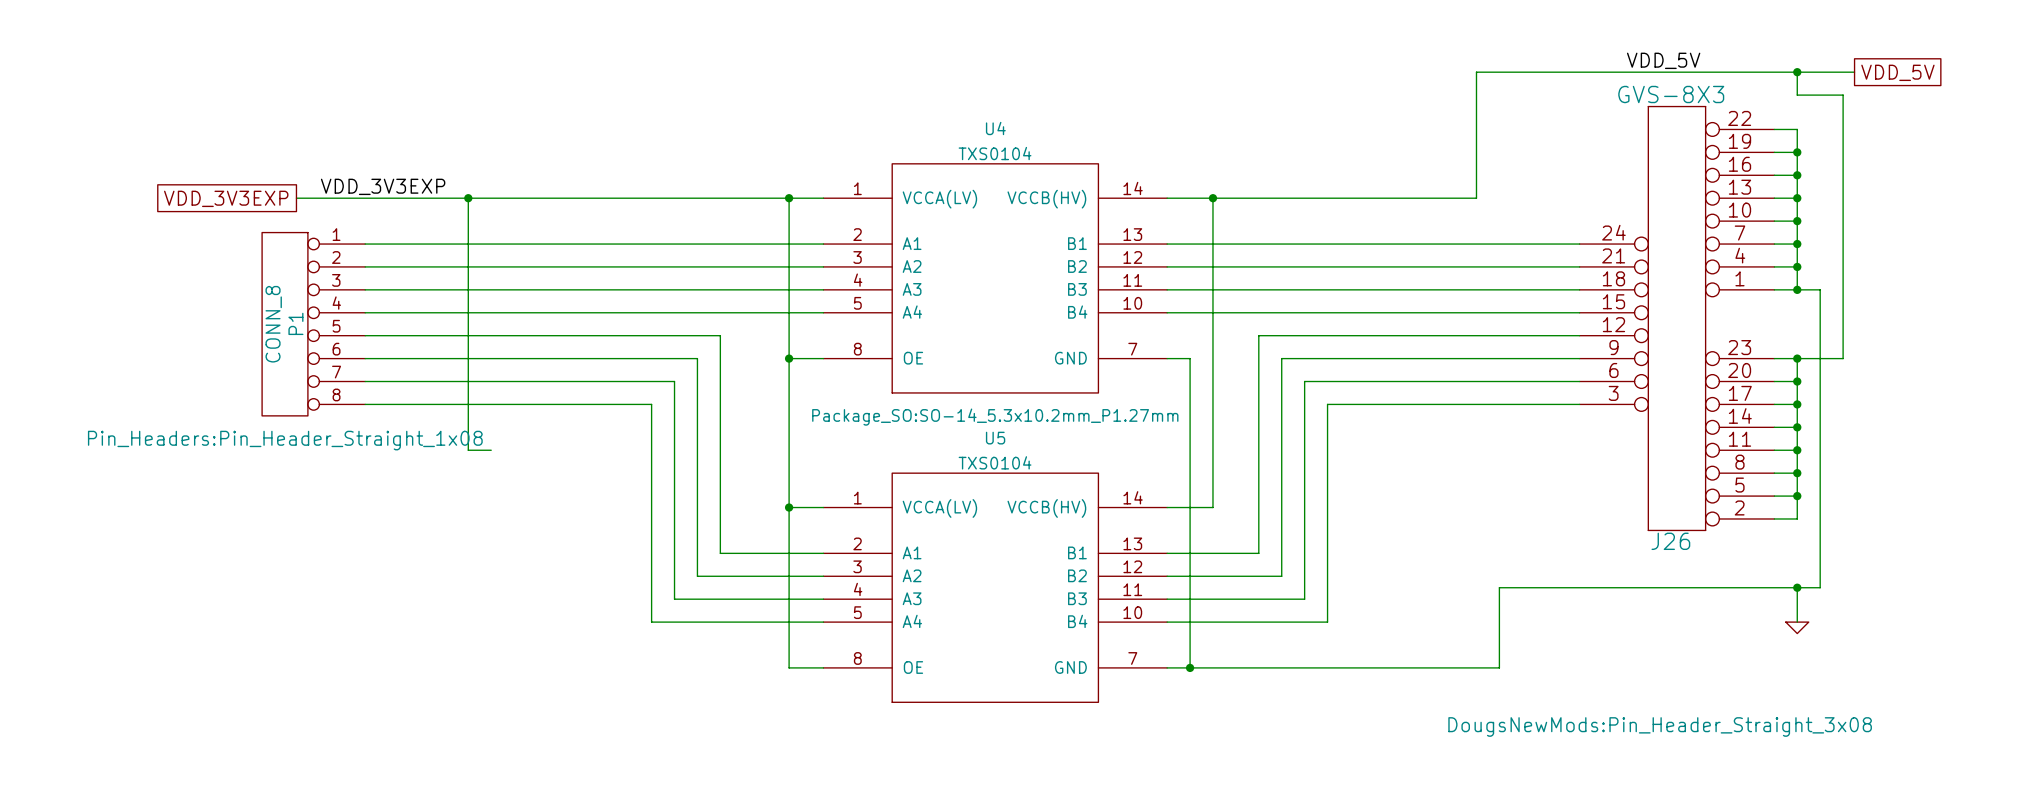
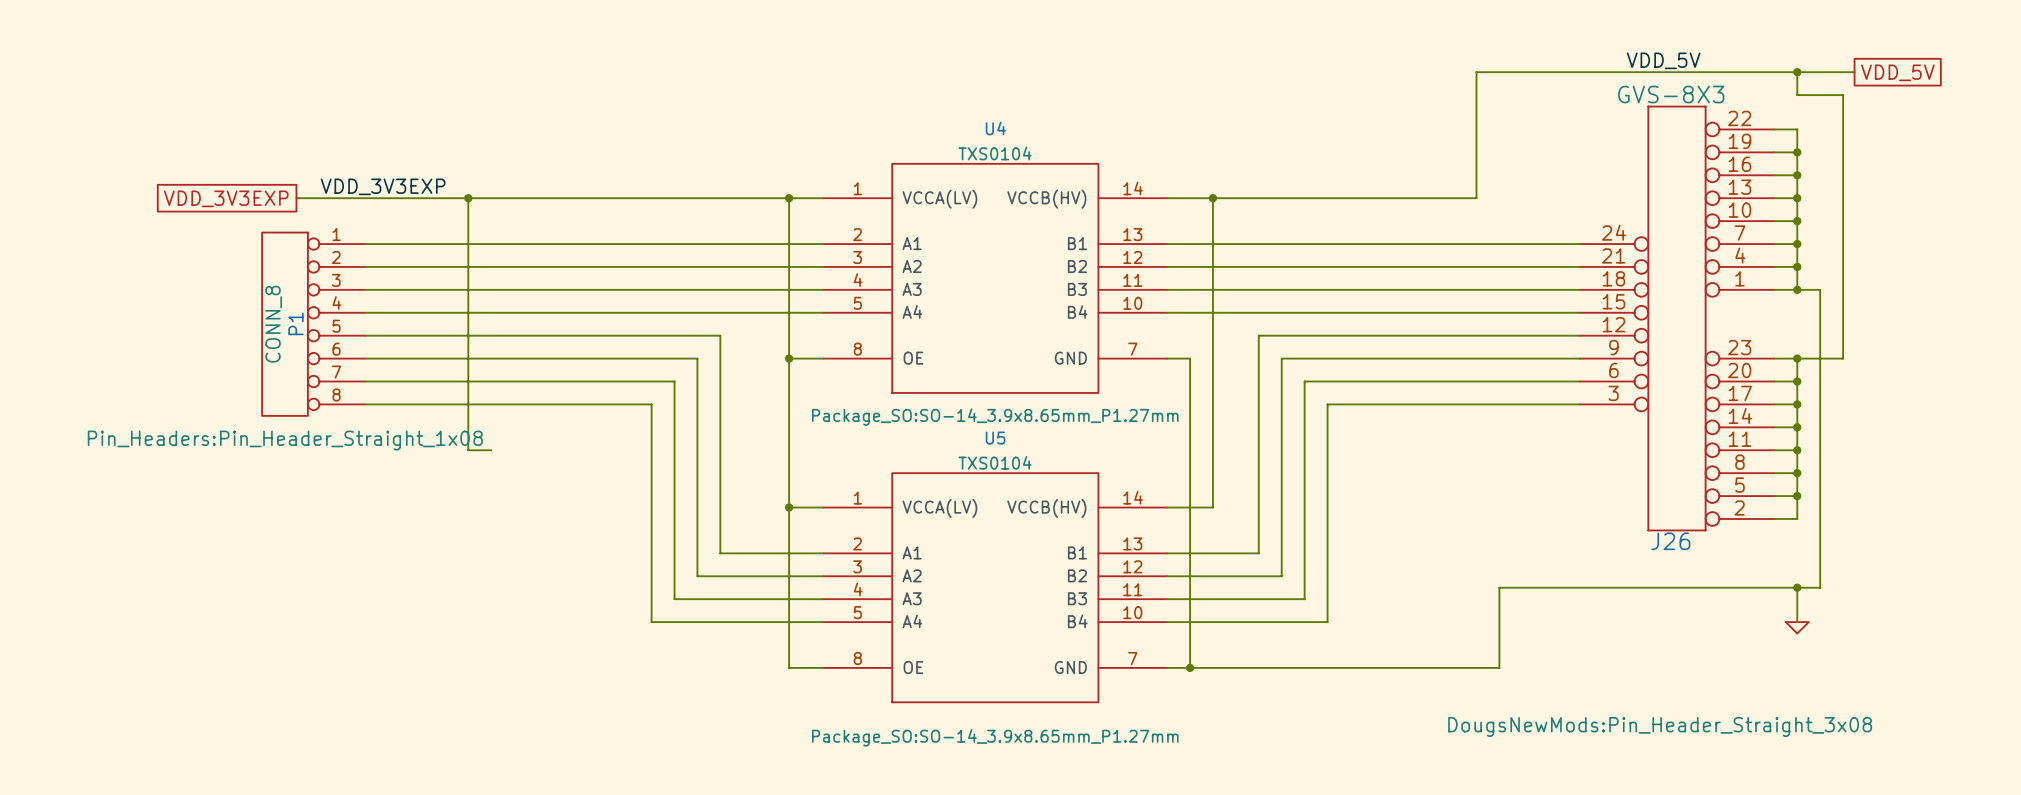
U4 text: Package_SO:SO-14_5.3x10.2mm_P1.27mm (995, 417) -> Package_SO:SO-14_3.9x8.65mm_P1.27mm (995, 417)
U5 text: none -> Package_SO:SO-14_3.9x8.65mm_P1.27mm (995, 737)

